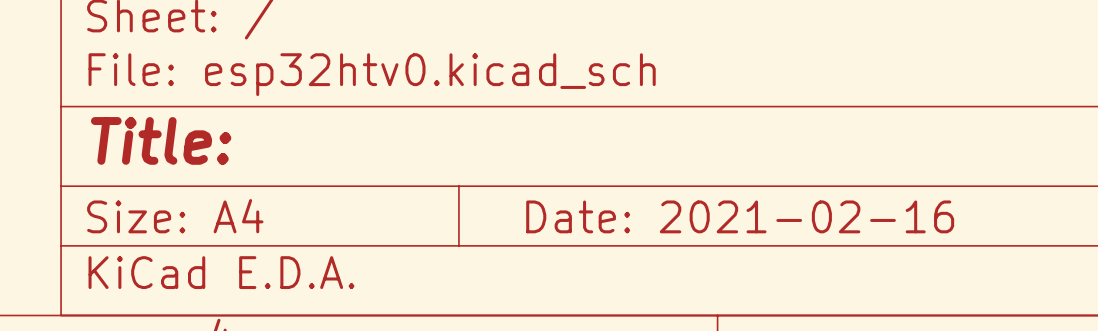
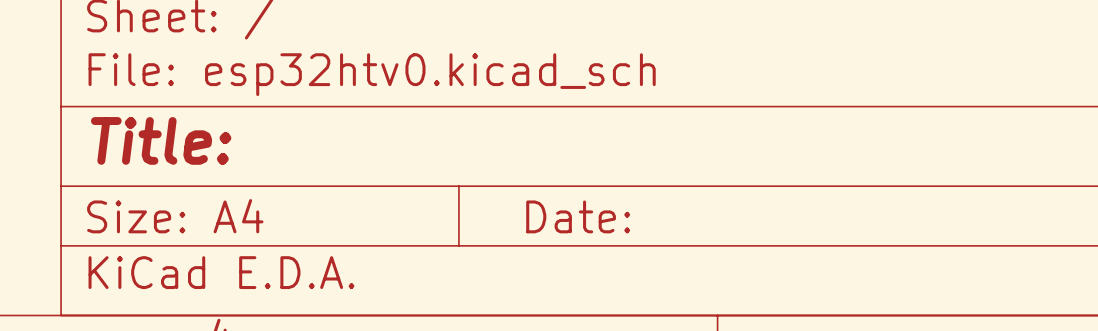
title block: Date: 2021-02-16 (740, 216) -> Date: (578, 216)

